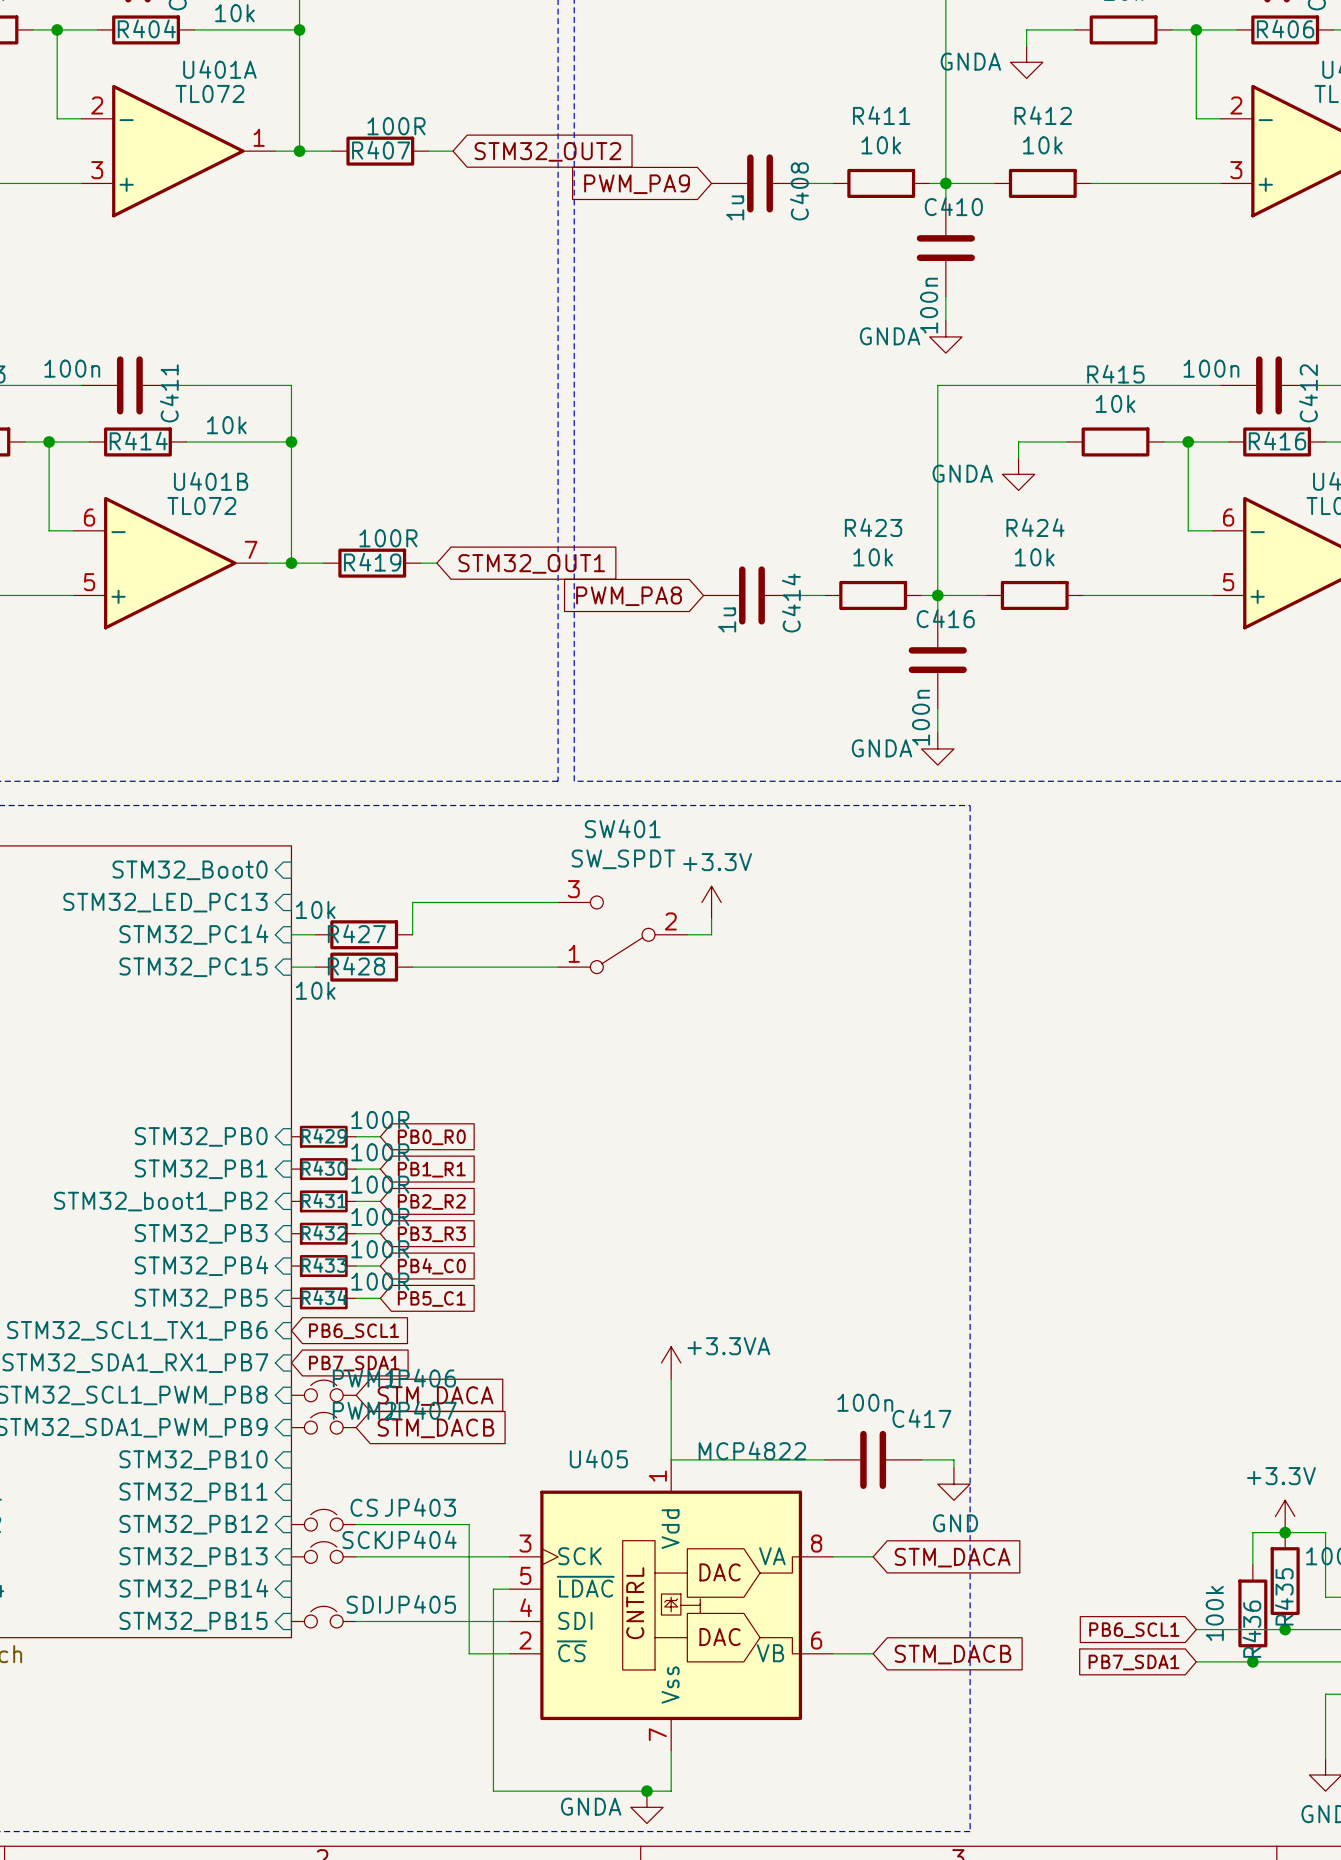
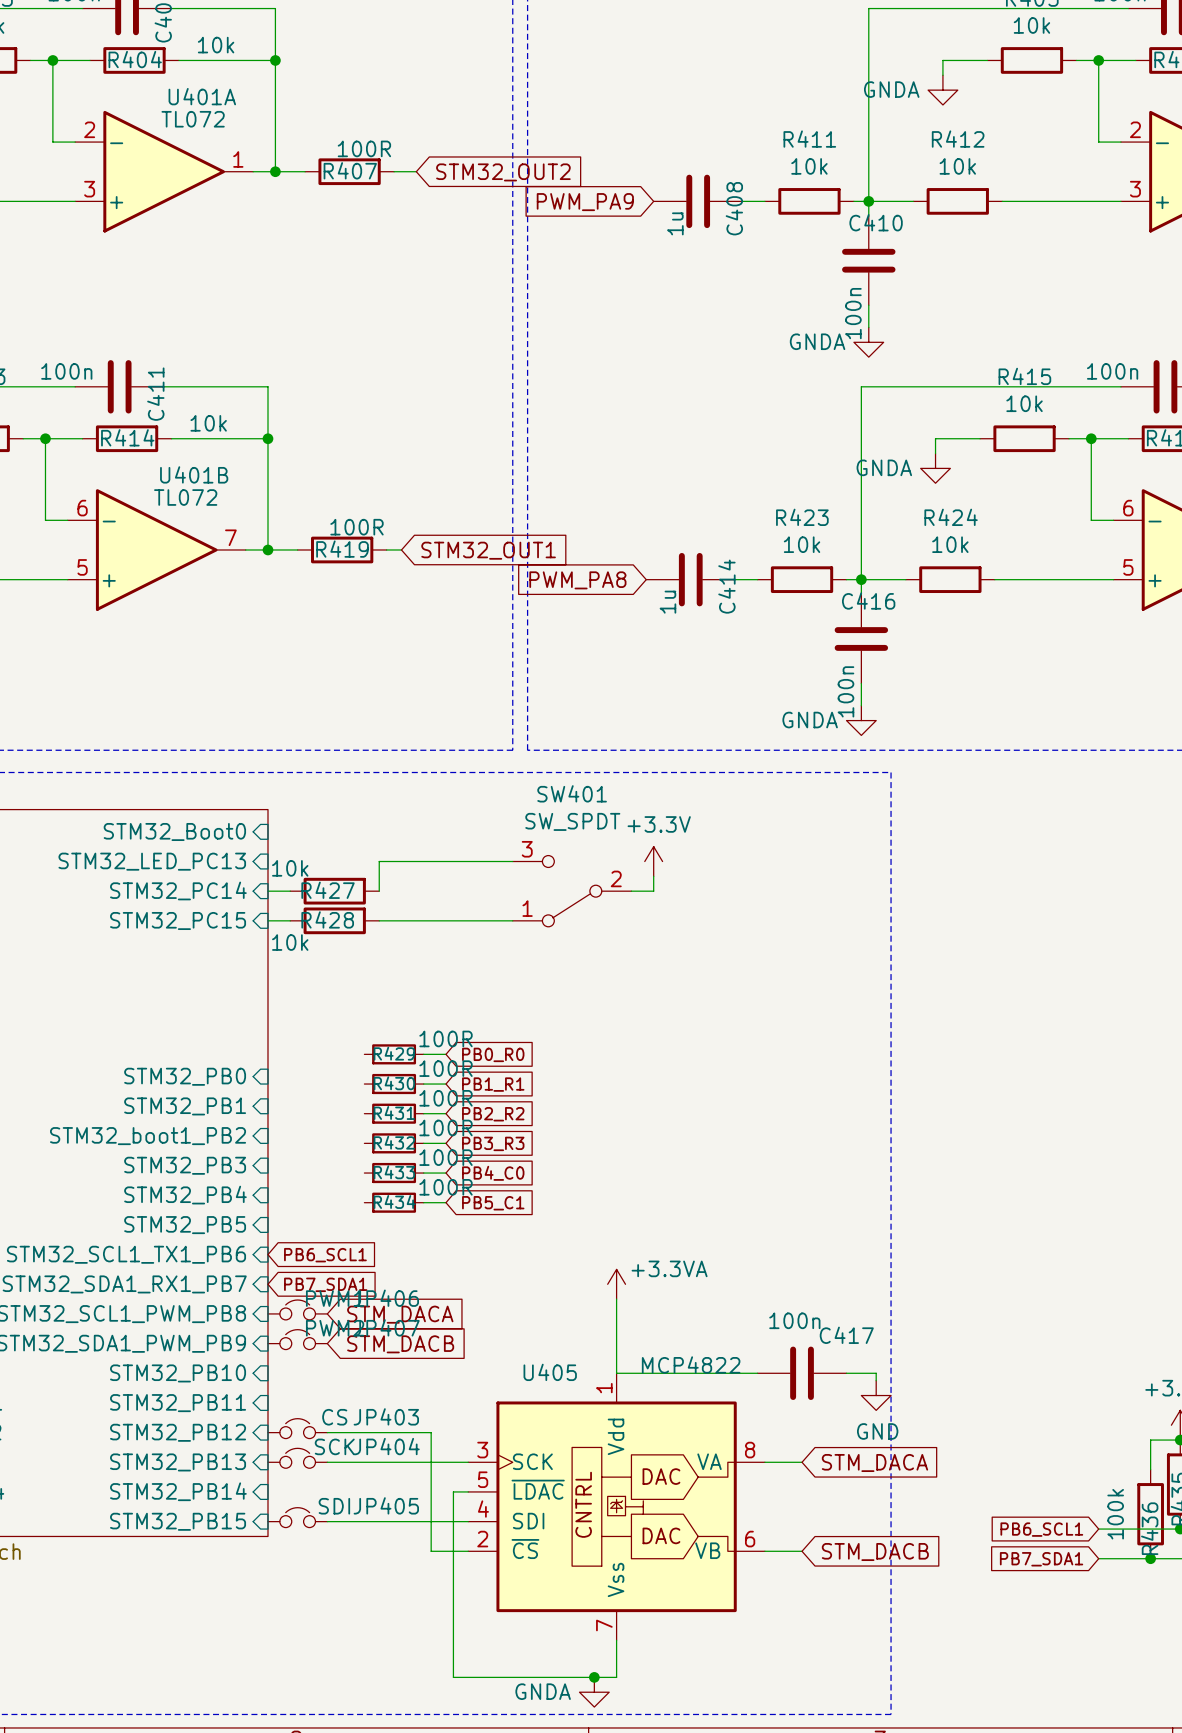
R429 position: (323, 1136) -> (394, 1054)
wire: (356, 1136) (380, 1136) -> (423, 1054) (446, 1054)
global label position: PB0_R0 (431, 1137) -> PB0_R0 (493, 1054)
R430 position: (323, 1169) -> (394, 1084)
wire: (356, 1169) (380, 1169) -> (423, 1084) (446, 1084)
global label position: PB1_R1 (431, 1169) -> PB1_R1 (493, 1084)
R431 position: (323, 1201) -> (394, 1113)
wire: (356, 1201) (380, 1201) -> (423, 1113) (446, 1113)
global label position: PB2_R2 (431, 1201) -> PB2_R2 (493, 1114)
R432 position: (323, 1233) -> (394, 1143)
wire: (356, 1233) (380, 1233) -> (423, 1143) (446, 1143)
global label position: PB3_R3 (431, 1234) -> PB3_R3 (493, 1143)
R433 position: (323, 1266) -> (394, 1173)
wire: (356, 1266) (380, 1266) -> (423, 1173) (446, 1173)
global label position: PB4_C0 (431, 1266) -> PB4_C0 (493, 1173)
R434 position: (323, 1298) -> (394, 1202)
wire: (356, 1298) (380, 1298) -> (423, 1202) (446, 1202)
global label position: PB5_C1 (431, 1298) -> PB5_C1 (493, 1203)

